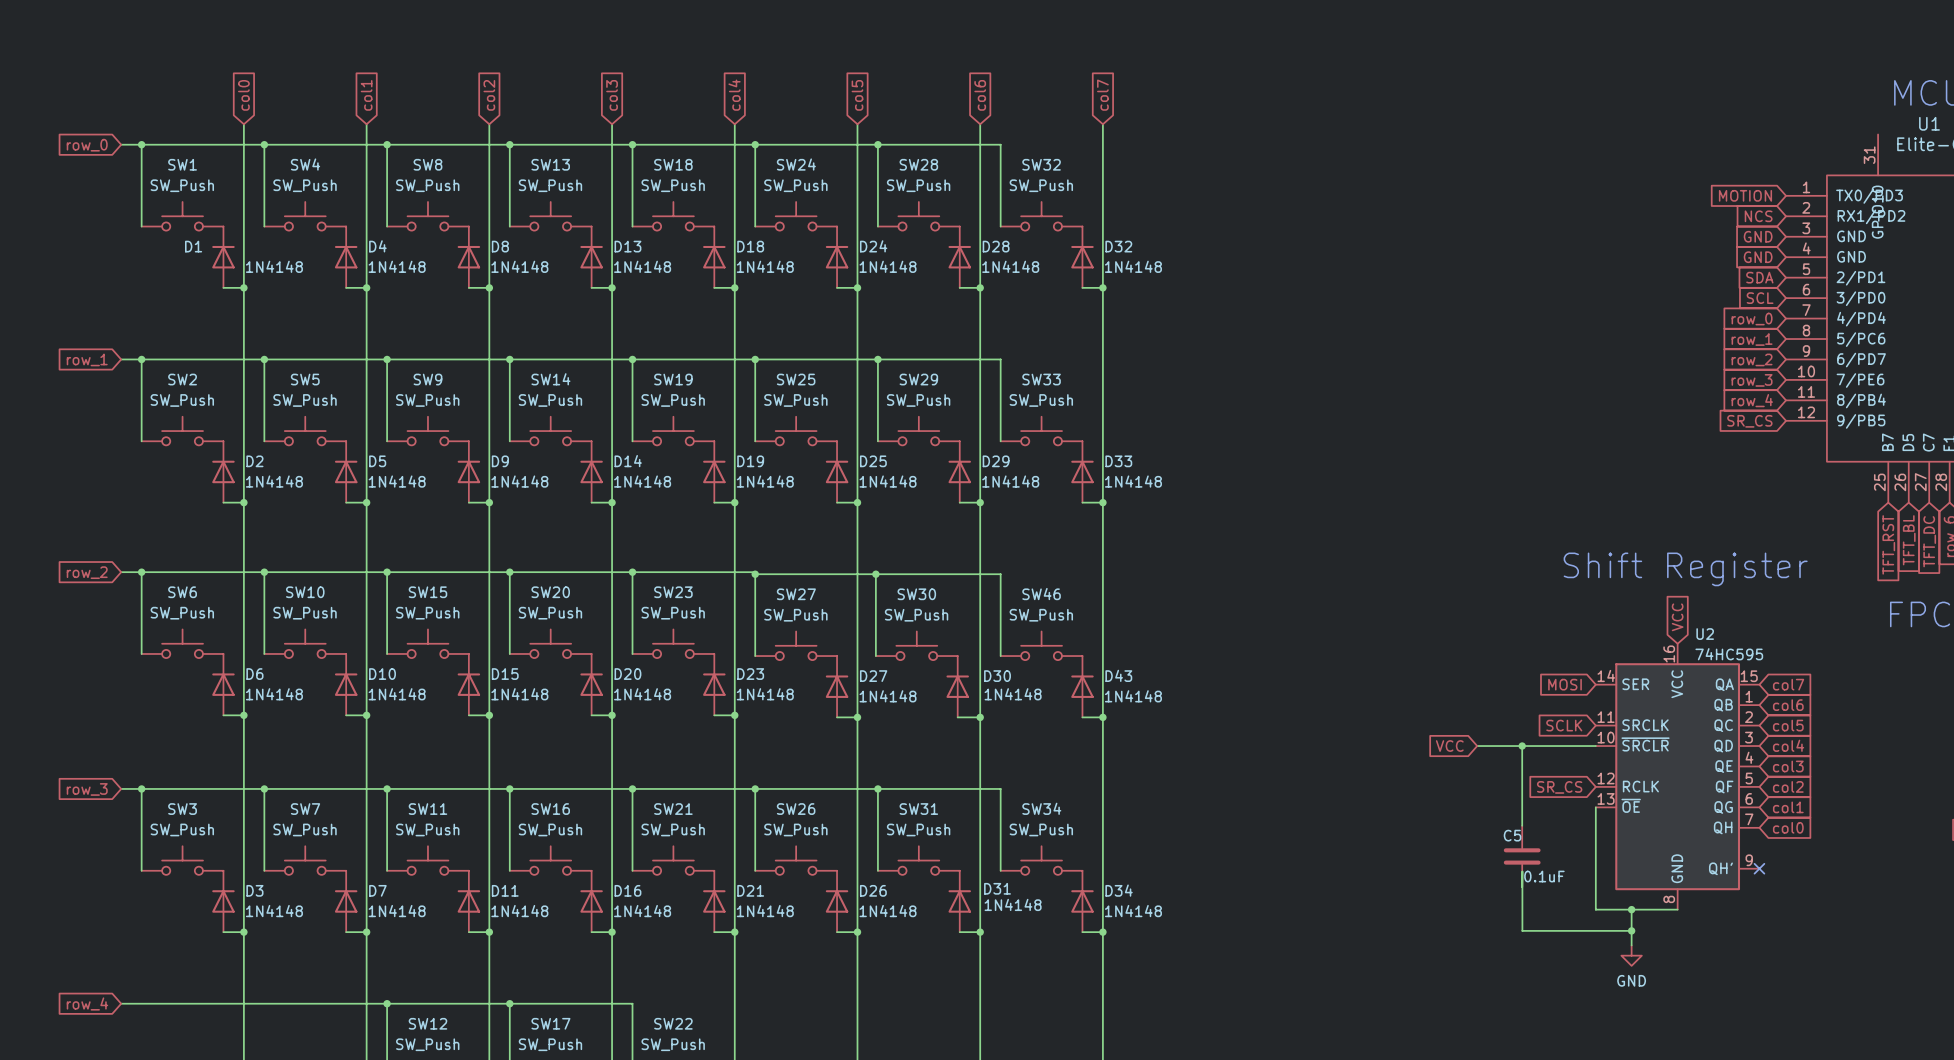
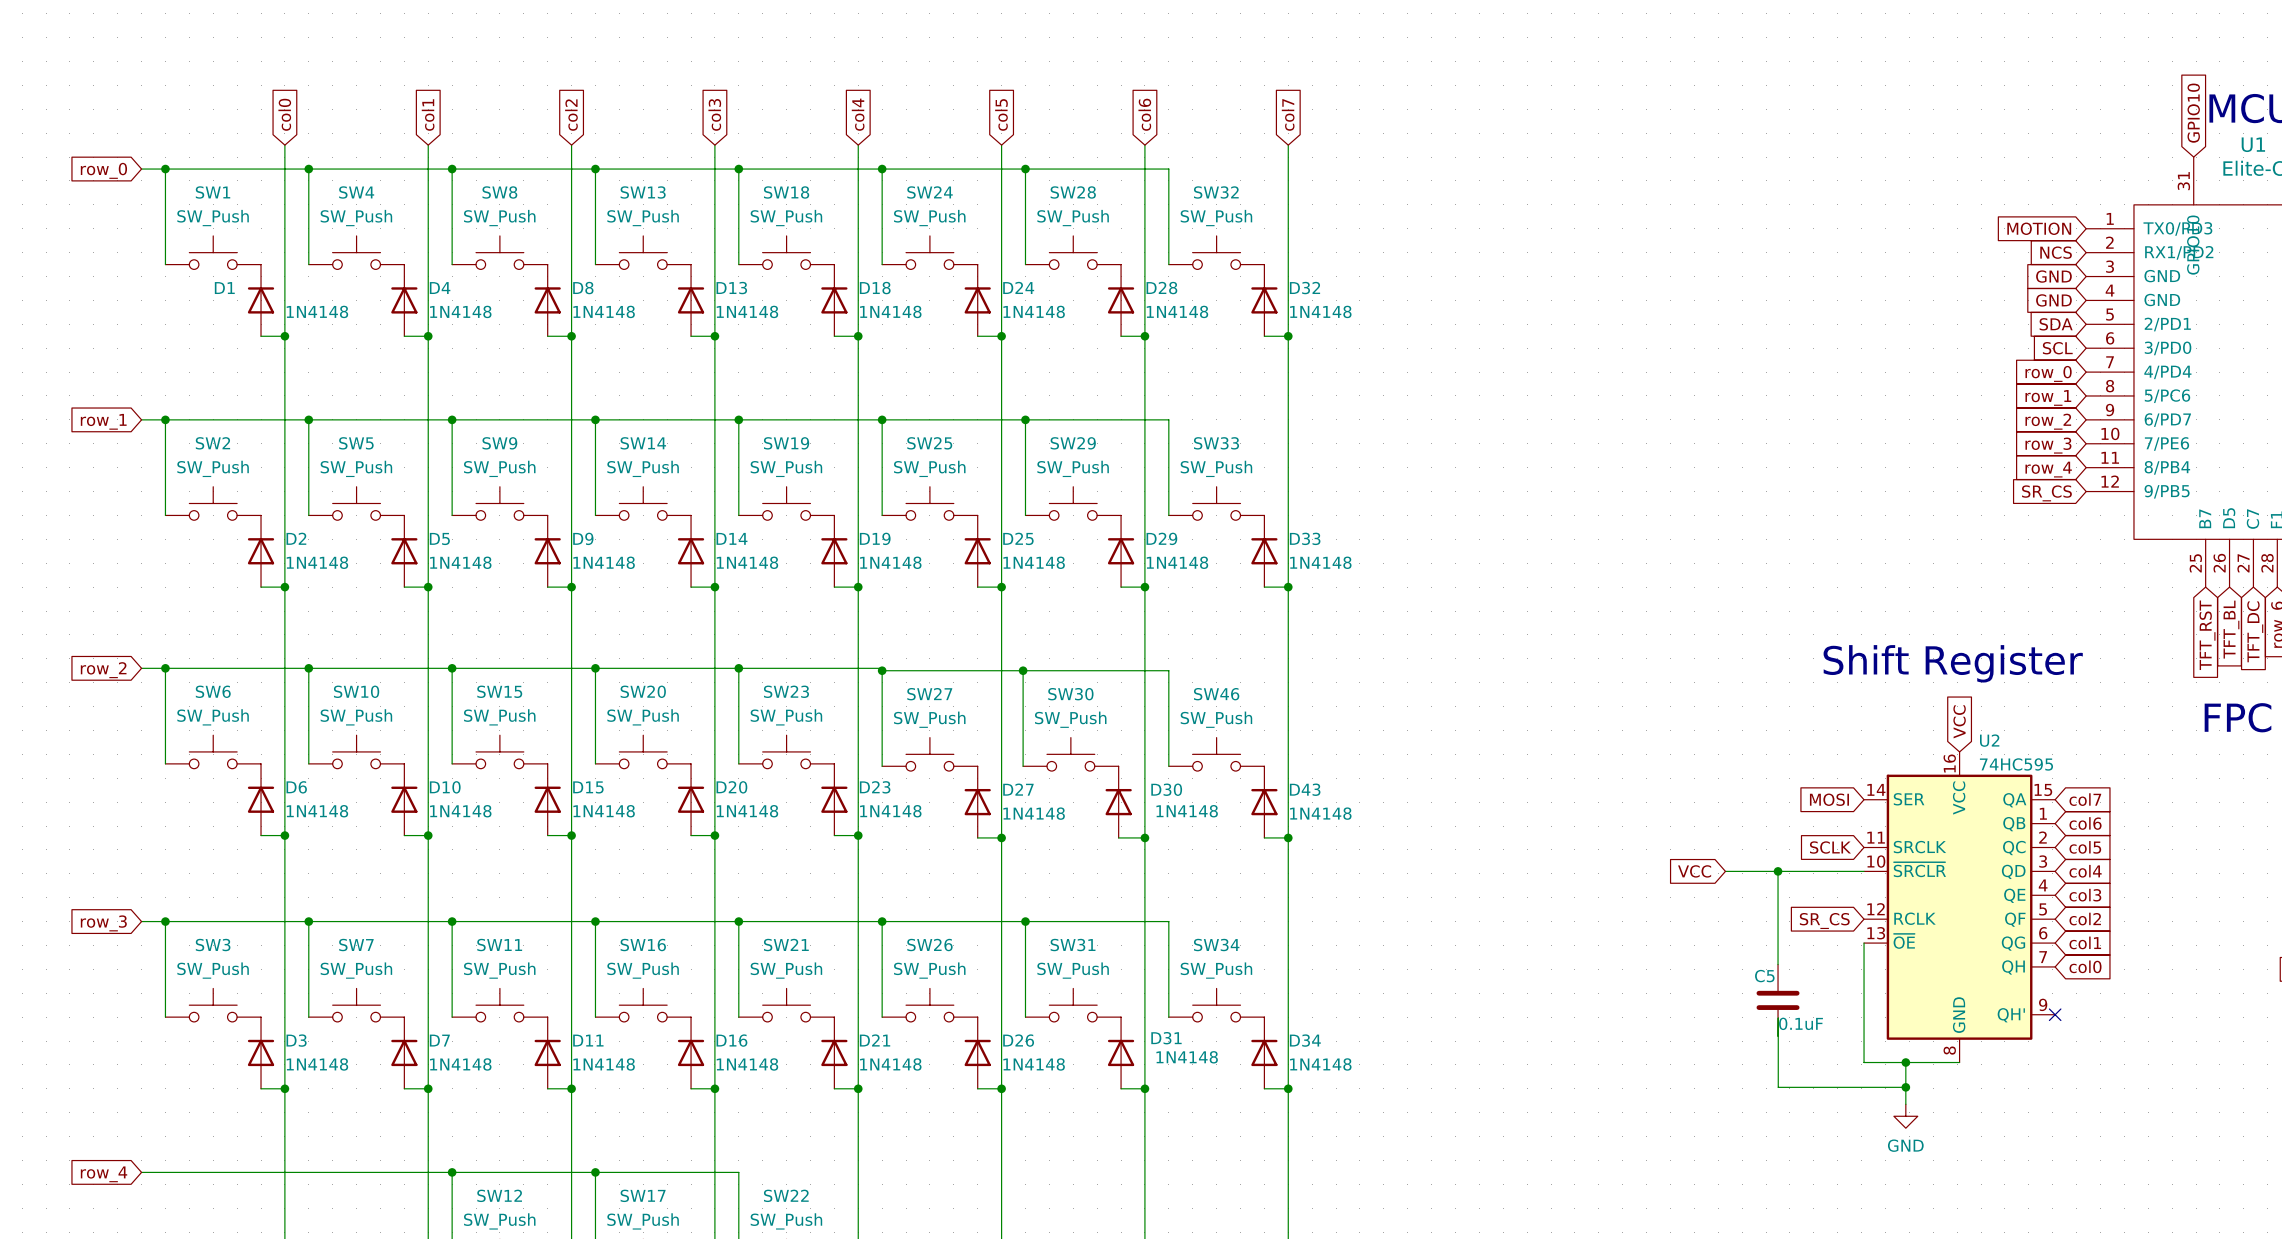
global label: none -> GPIO10 (2193, 113)

